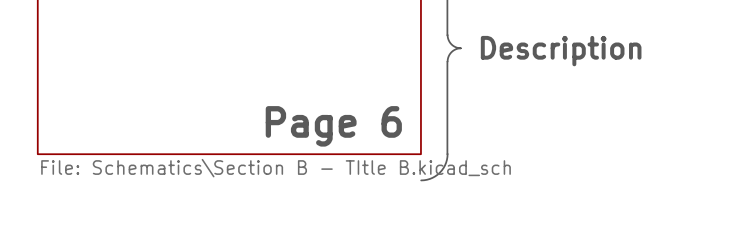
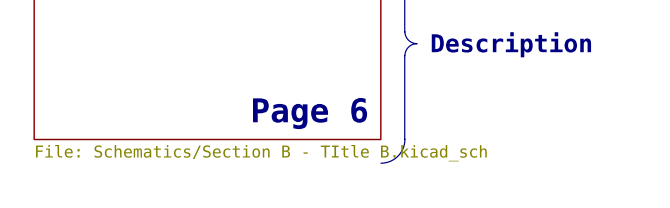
sheet value: File: Schematics\Section B - TItle B.kicad_sch (276, 168) -> File: Schematics/Section B - TItle B.kicad_sch (261, 153)

